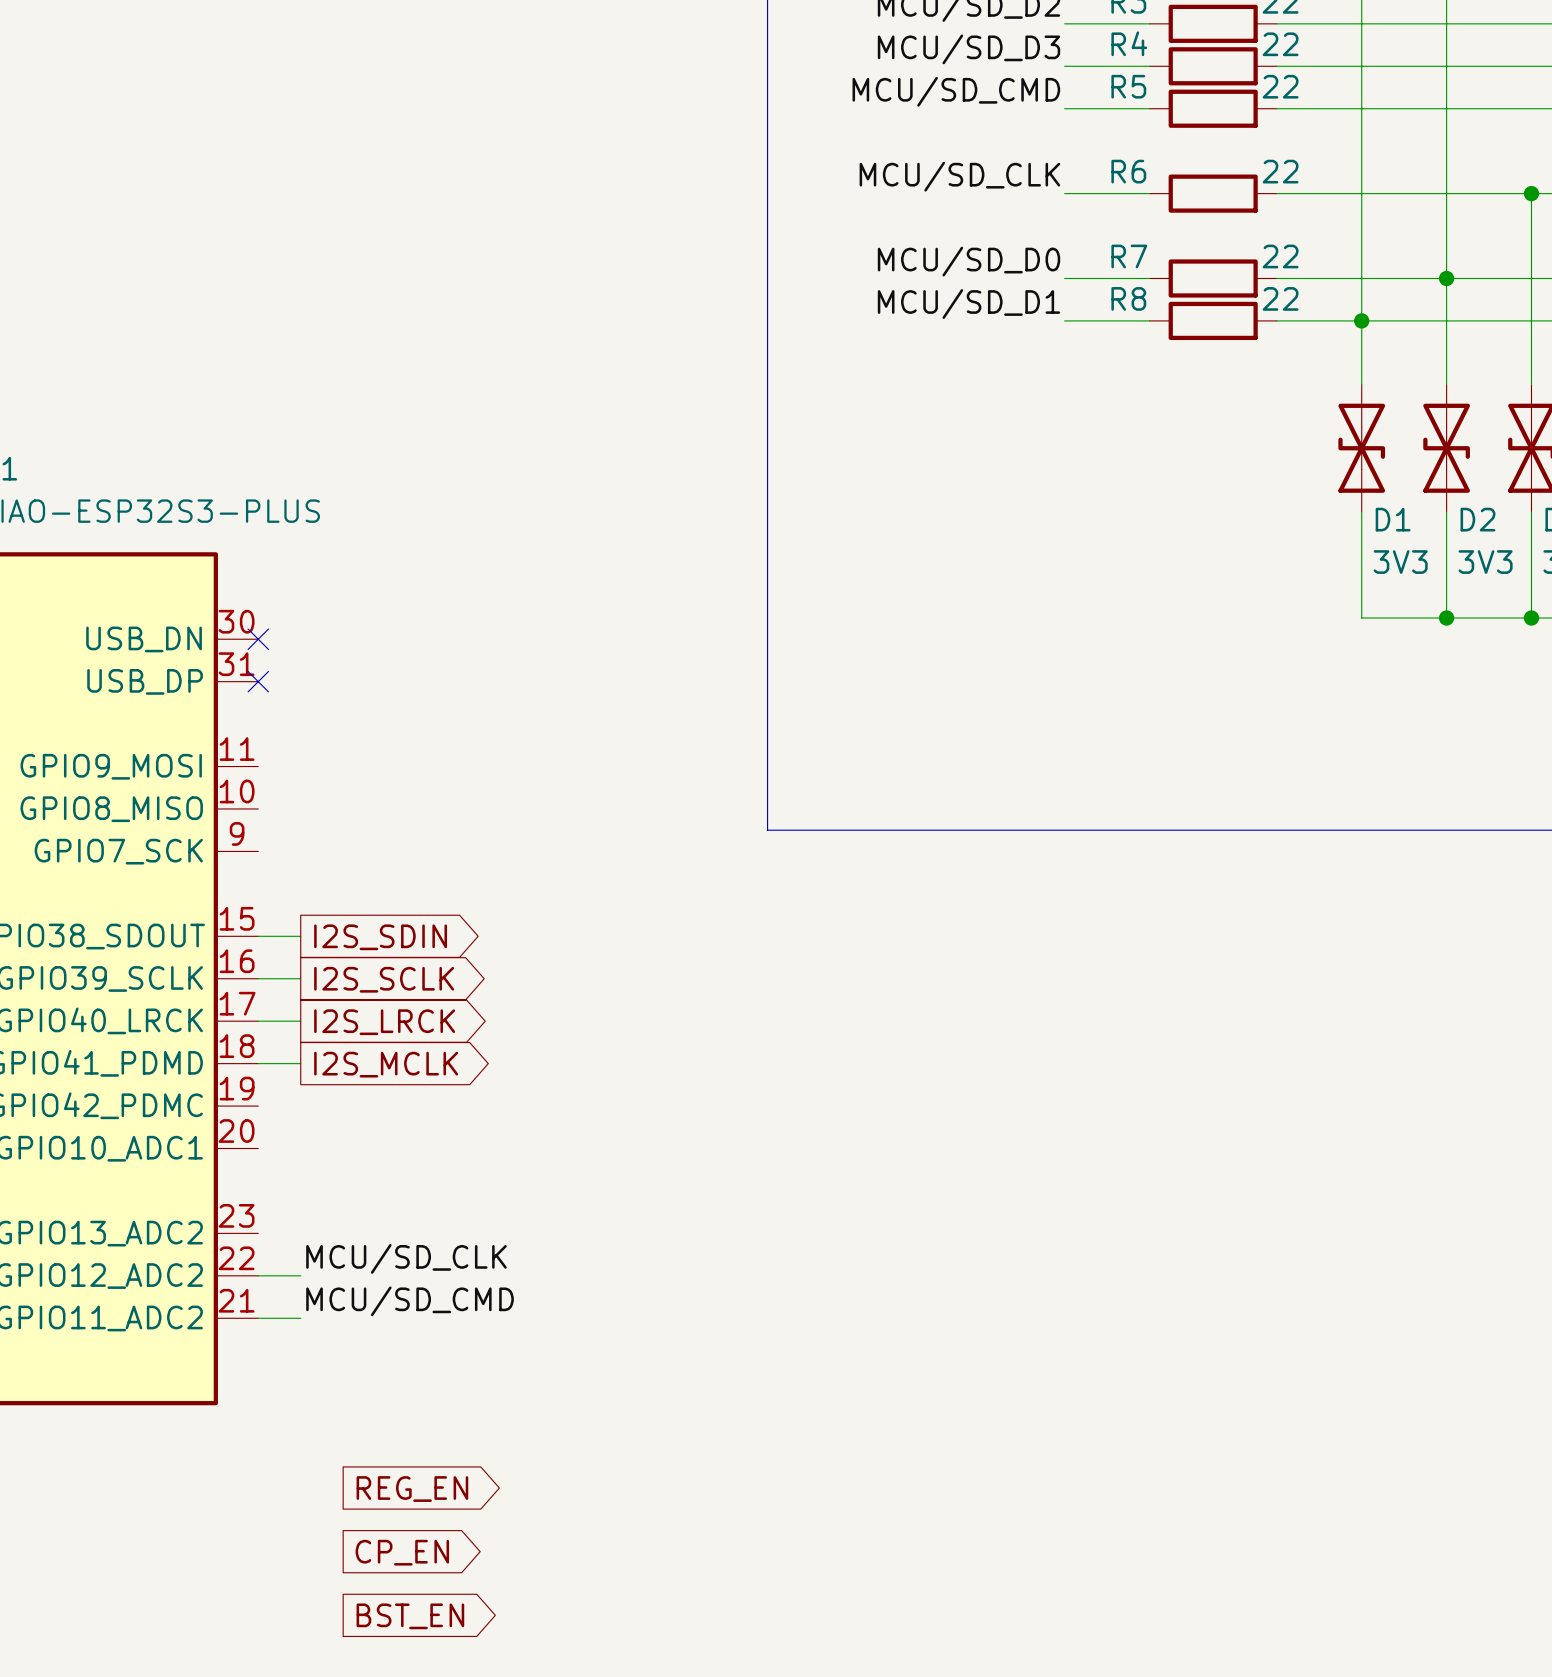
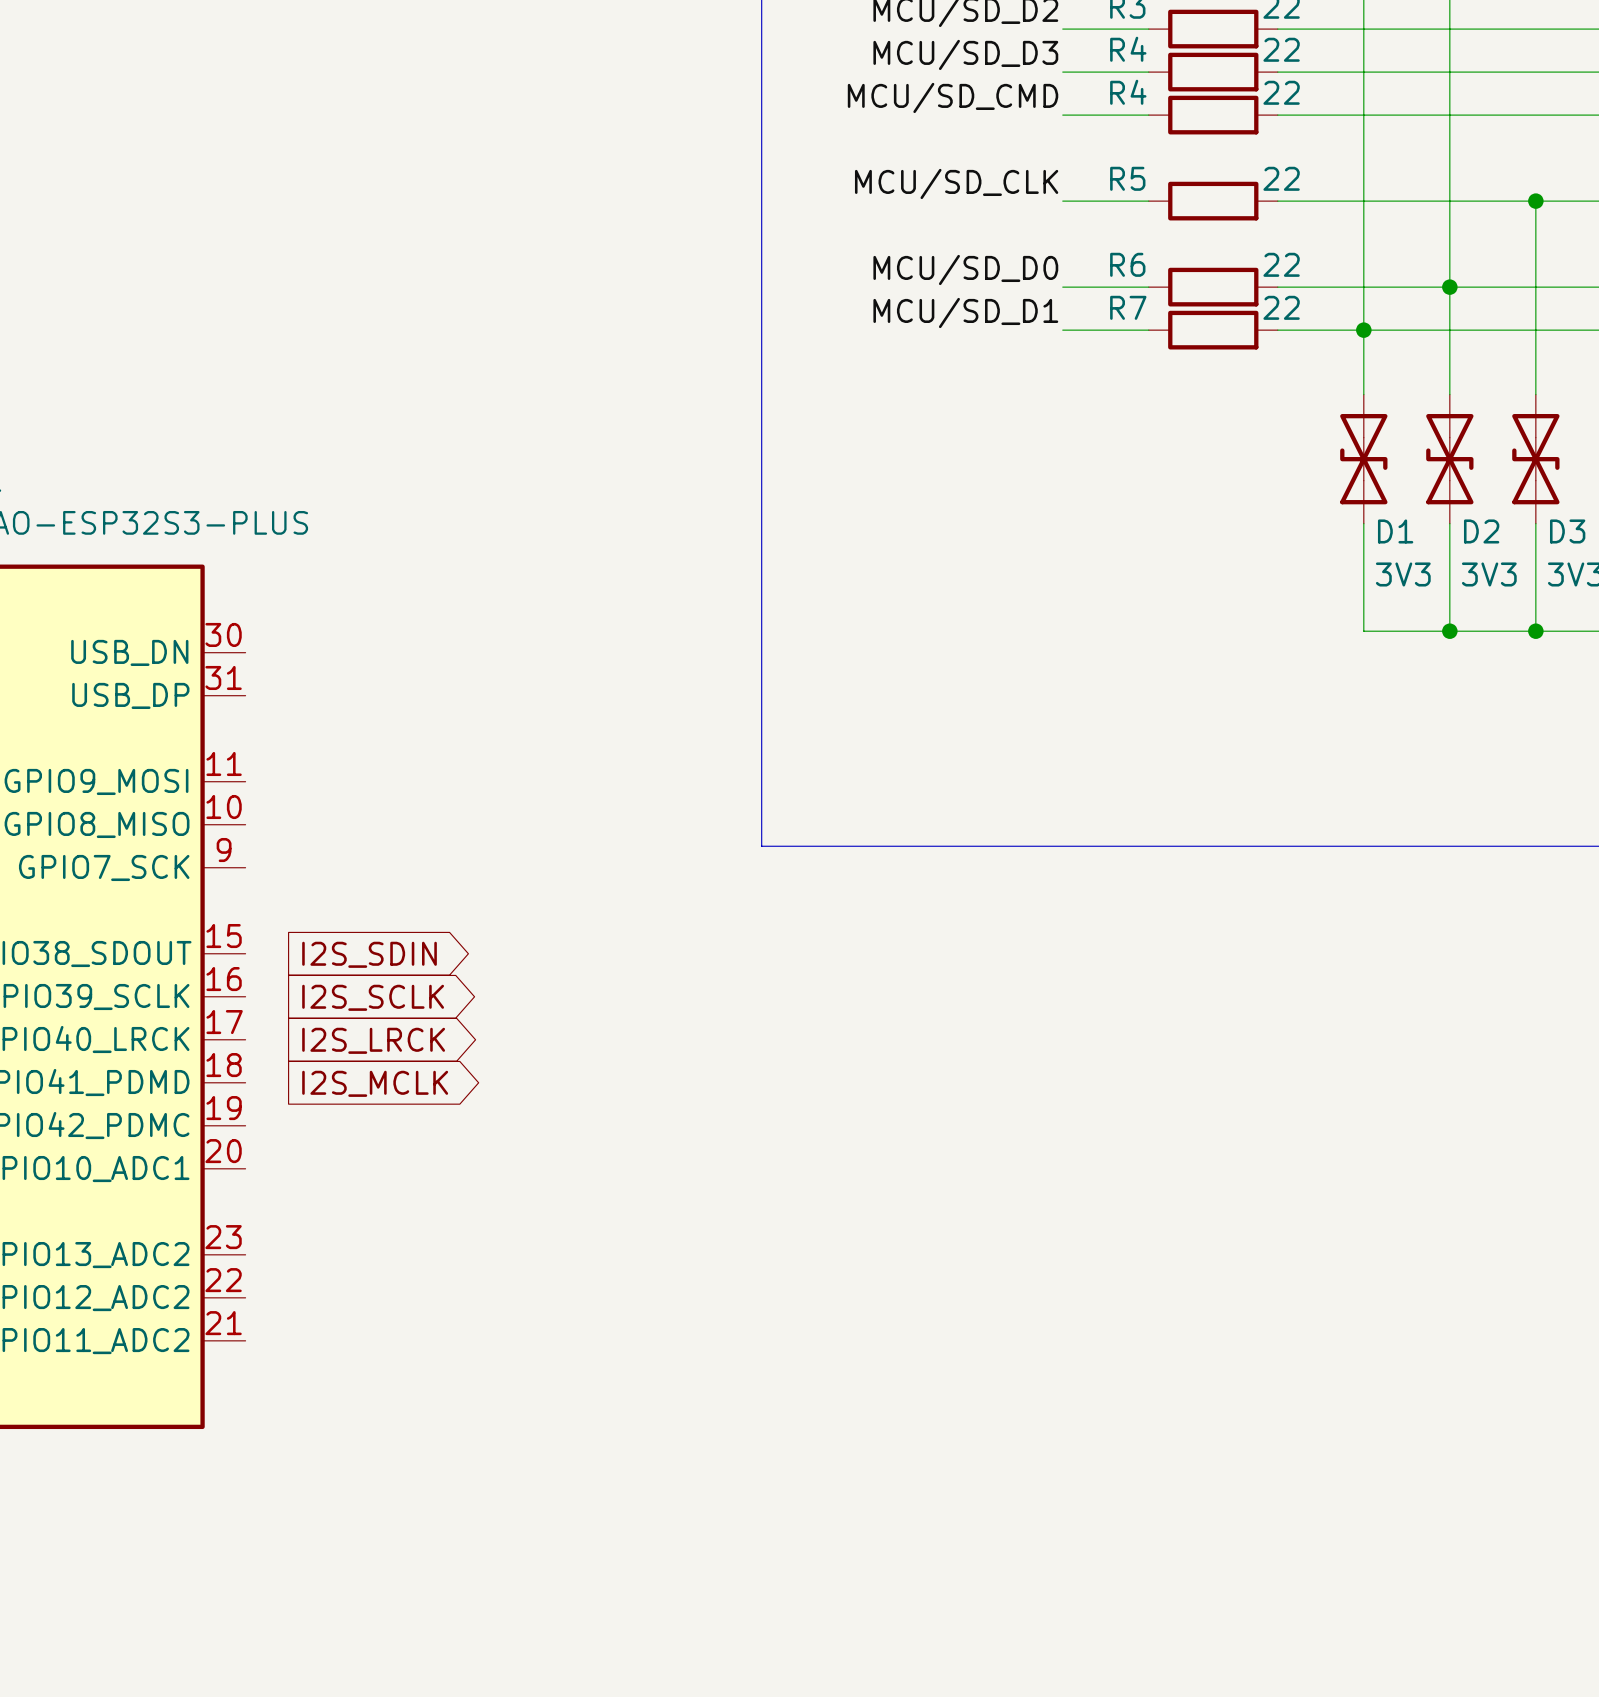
R5 name: R5 (1128, 86) -> R4 (1128, 92)
R6 name: R6 (1128, 171) -> R5 (1127, 178)
R7 name: R7 (1129, 256) -> R6 (1127, 264)
R8 name: R8 (1128, 298) -> R7 (1128, 307)
no-connect mark: (258, 639) -> none
no-connect mark: (258, 681) -> none
wire: (258, 936) (300, 936) -> none
wire: (258, 978) (300, 978) -> none
wire: (258, 1021) (300, 1021) -> none
wire: (258, 1063) (300, 1063) -> none
label: MCU/SD_CLK (406, 1258) -> none
wire: (258, 1275) (300, 1275) -> none
label: MCU/SD_CMD (410, 1301) -> none
wire: (258, 1318) (300, 1318) -> none
global label: REG_EN (412, 1489) -> none
global label: CP_EN (402, 1552) -> none
global label: BST_EN (410, 1616) -> none

